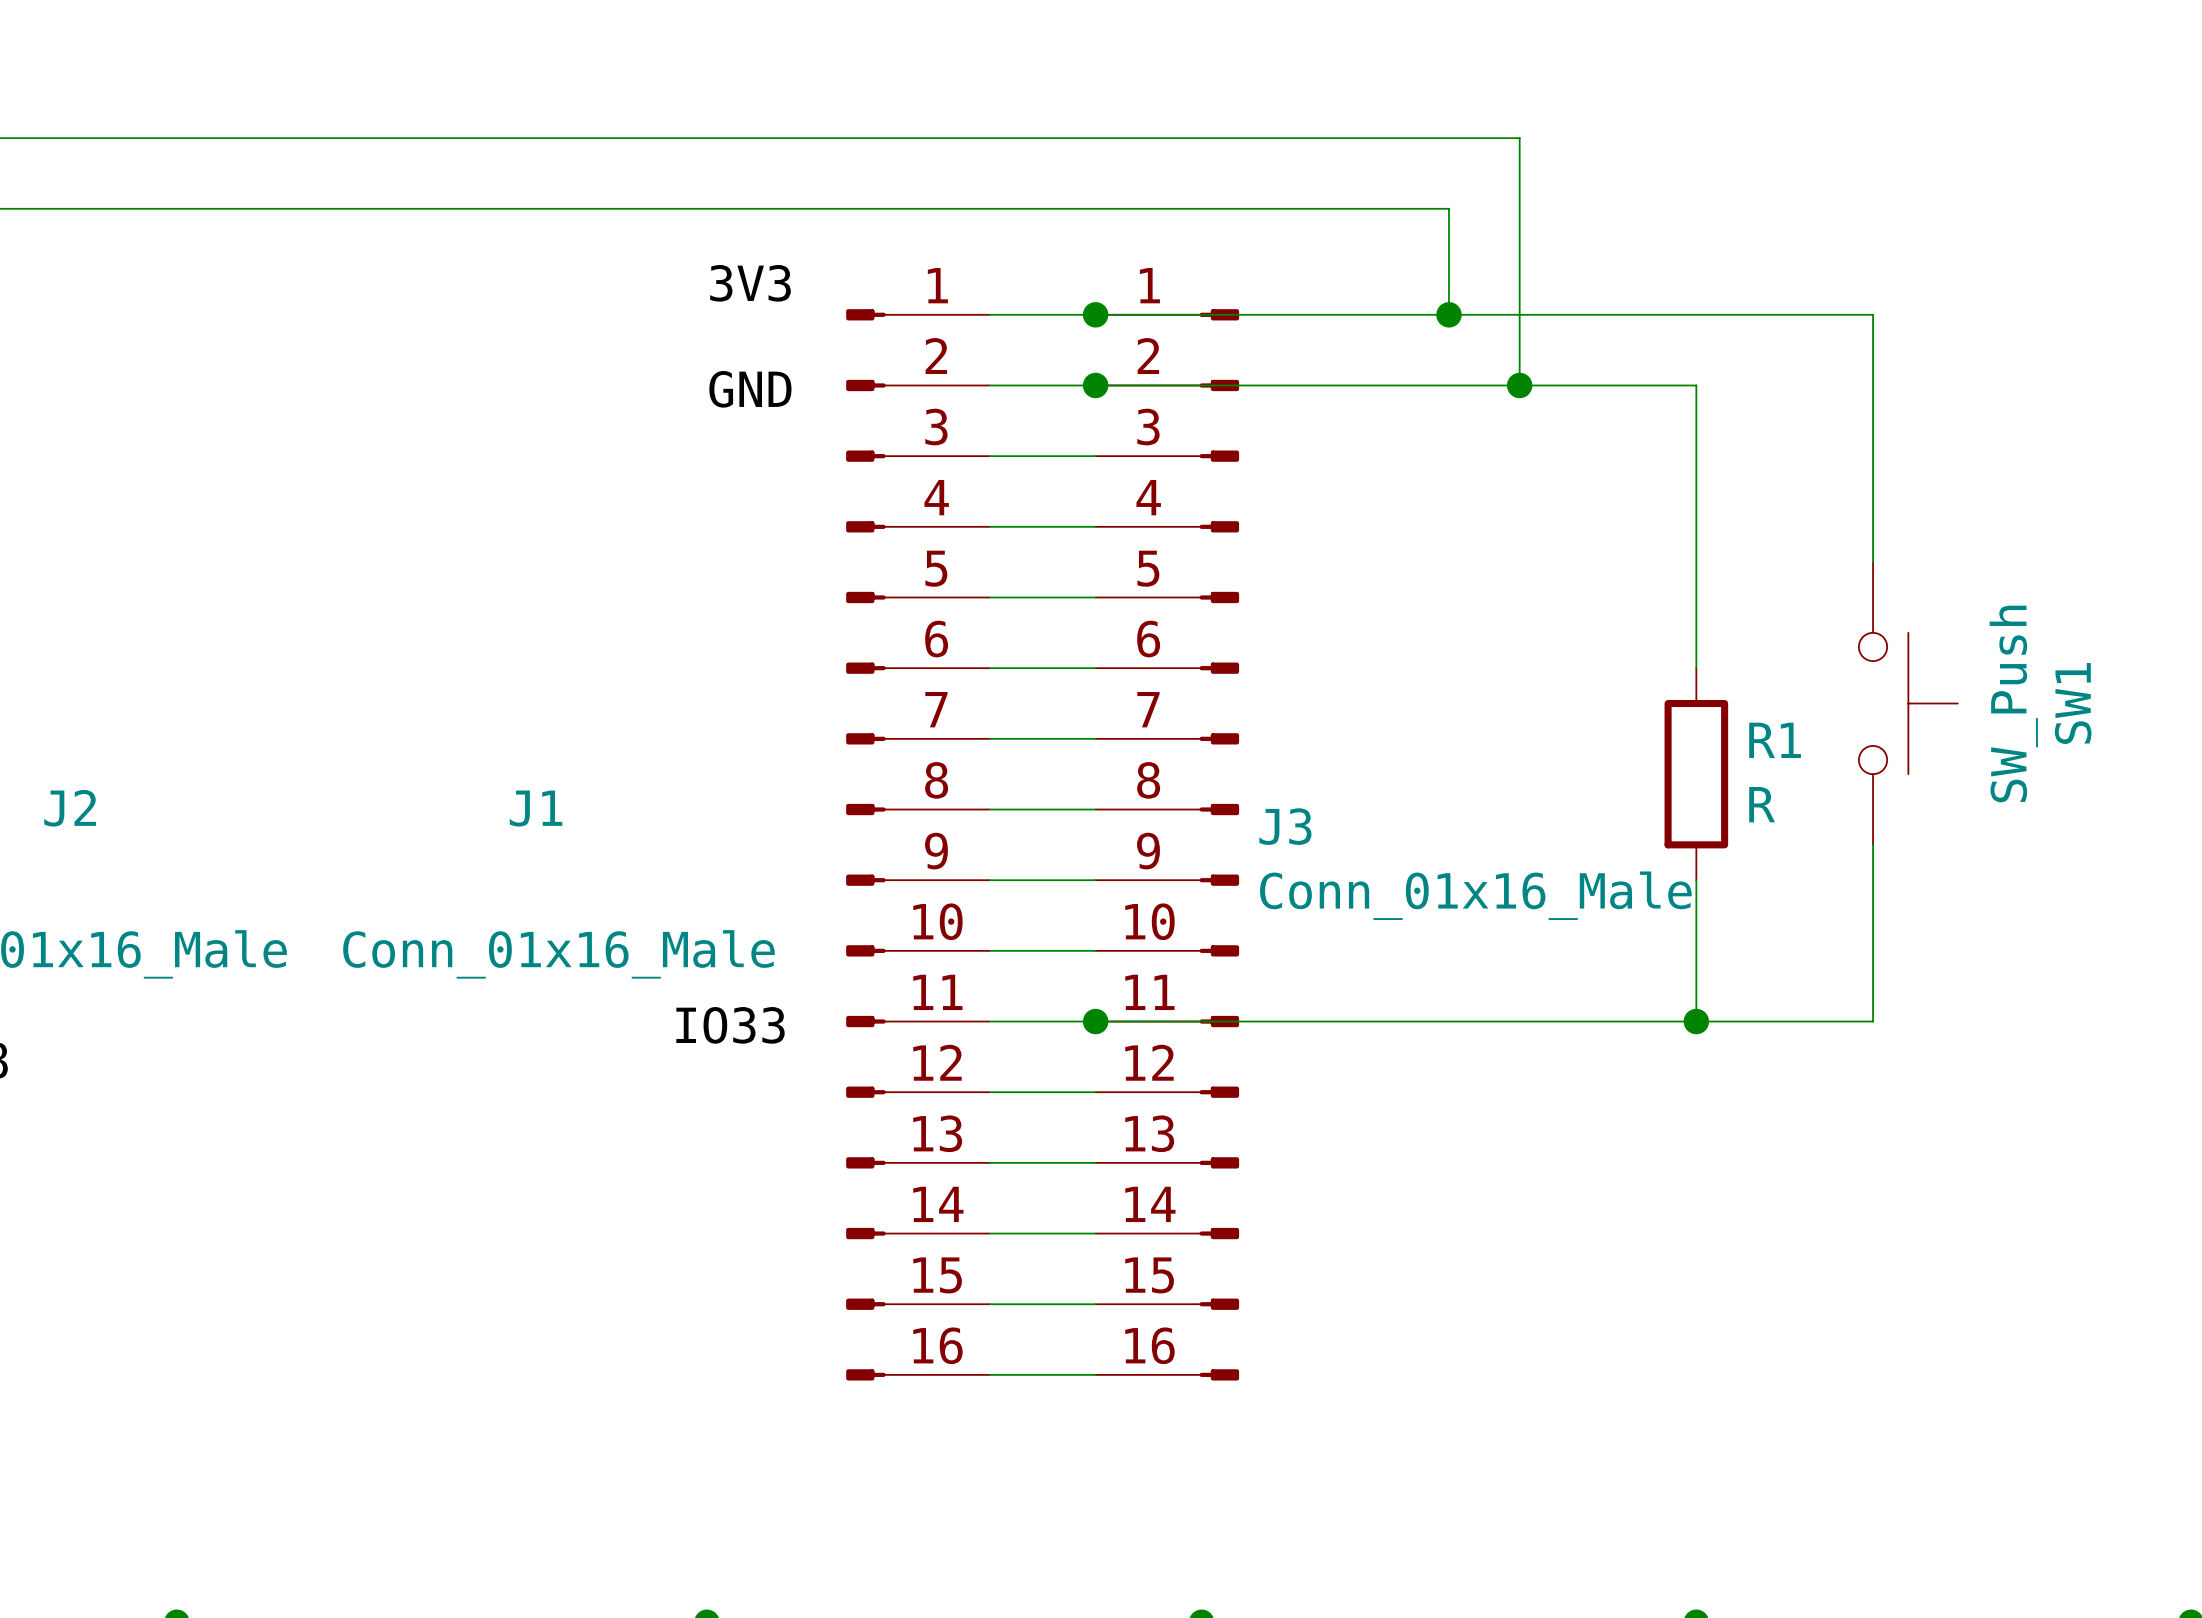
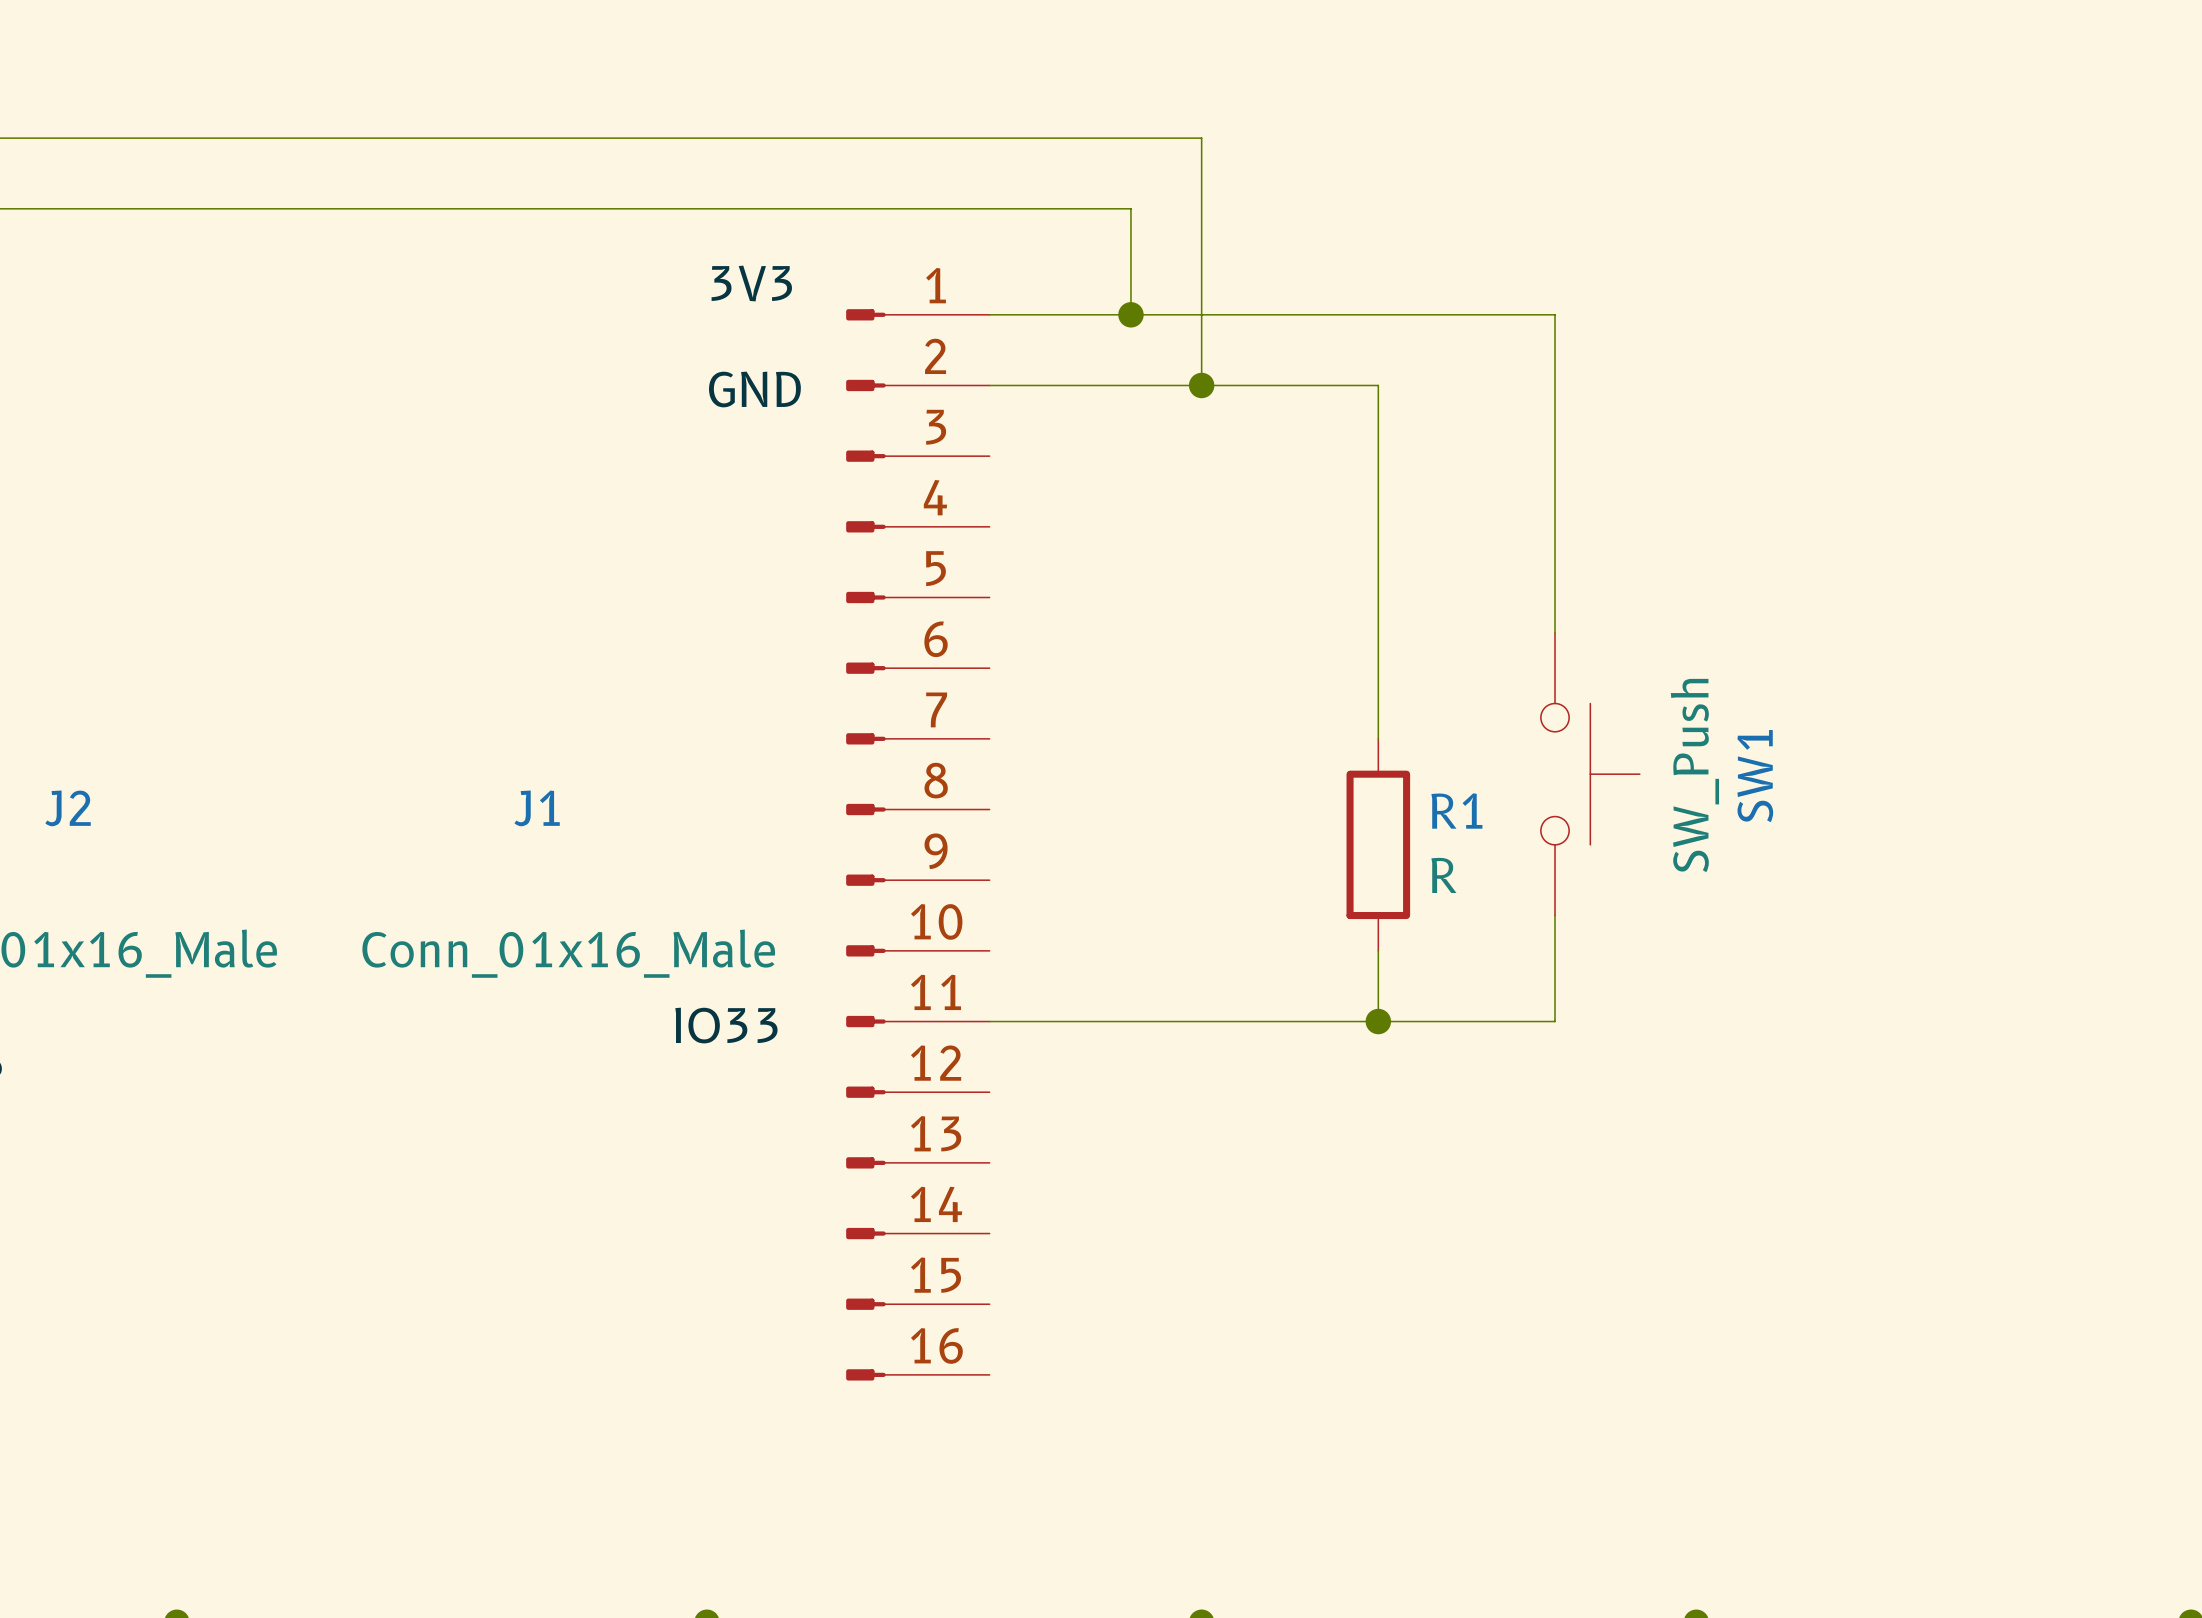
wire: (1201, 138) (1519, 138) (1519, 385) -> (1201, 138) (1201, 385)
wire: (1130, 208) (1448, 208) (1448, 314) -> (1130, 208) (1130, 314)
junction position: (1095, 314) -> (1130, 314)
junction: (1448, 314) -> none
wire: (1555, 314) (1873, 314) (1873, 562) -> (1555, 314) (1555, 632)
junction: (1095, 385) -> none
junction: none -> (1201, 385)
wire: (1378, 385) (1696, 385) (1696, 668) -> (1378, 385) (1378, 738)
junction: (1519, 385) -> none
wire: (989, 456) (1095, 456) -> none
wire: (989, 526) (1095, 526) -> none
wire: (989, 597) (1095, 597) -> none
wire: (989, 668) (1095, 668) -> none
SW1 position: (1908, 703) -> (1590, 774)
wire: (989, 738) (1095, 738) -> none
R1 position: (1696, 774) -> (1378, 844)
wire: (989, 809) (1095, 809) -> none
J3: Conn_01x16_Male (1167, 844) -> none
wire: (1873, 844) (1873, 1021) (1555, 1021) -> (1555, 915) (1555, 1021)
wire: (989, 880) (1095, 880) -> none
wire: (1696, 880) (1696, 1021) -> none
wire: (989, 950) (1095, 950) -> none
wire: none -> (1378, 950) (1378, 1021)
junction: (1095, 1021) -> none
junction: none -> (1378, 1021)
junction: (1696, 1021) -> none
wire: (989, 1092) (1095, 1092) -> none
wire: (989, 1162) (1095, 1162) -> none
wire: (989, 1233) (1095, 1233) -> none
wire: (989, 1304) (1095, 1304) -> none
wire: (989, 1374) (1095, 1374) -> none

